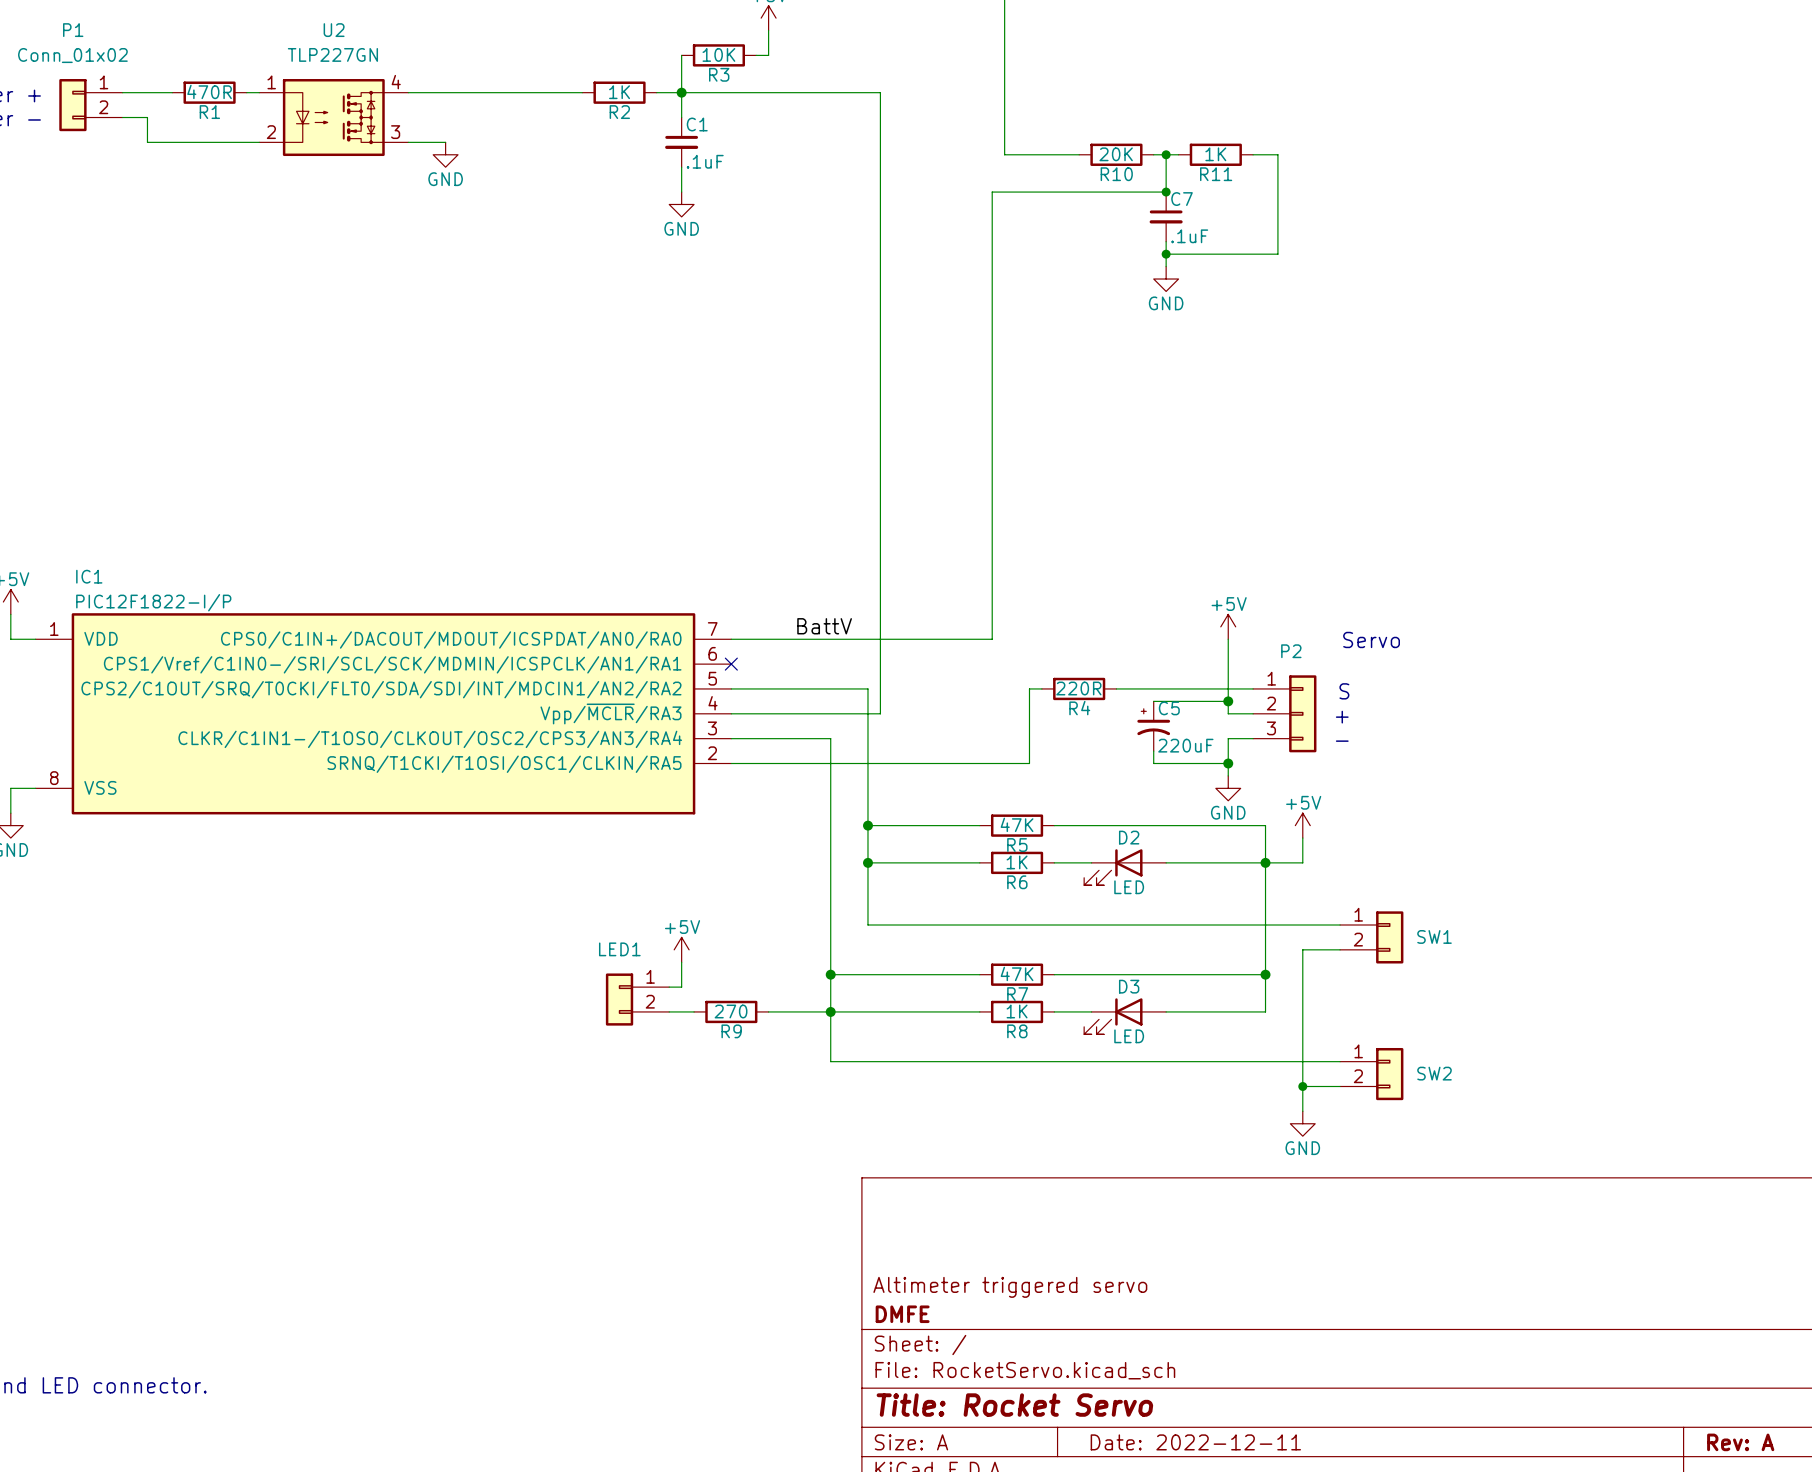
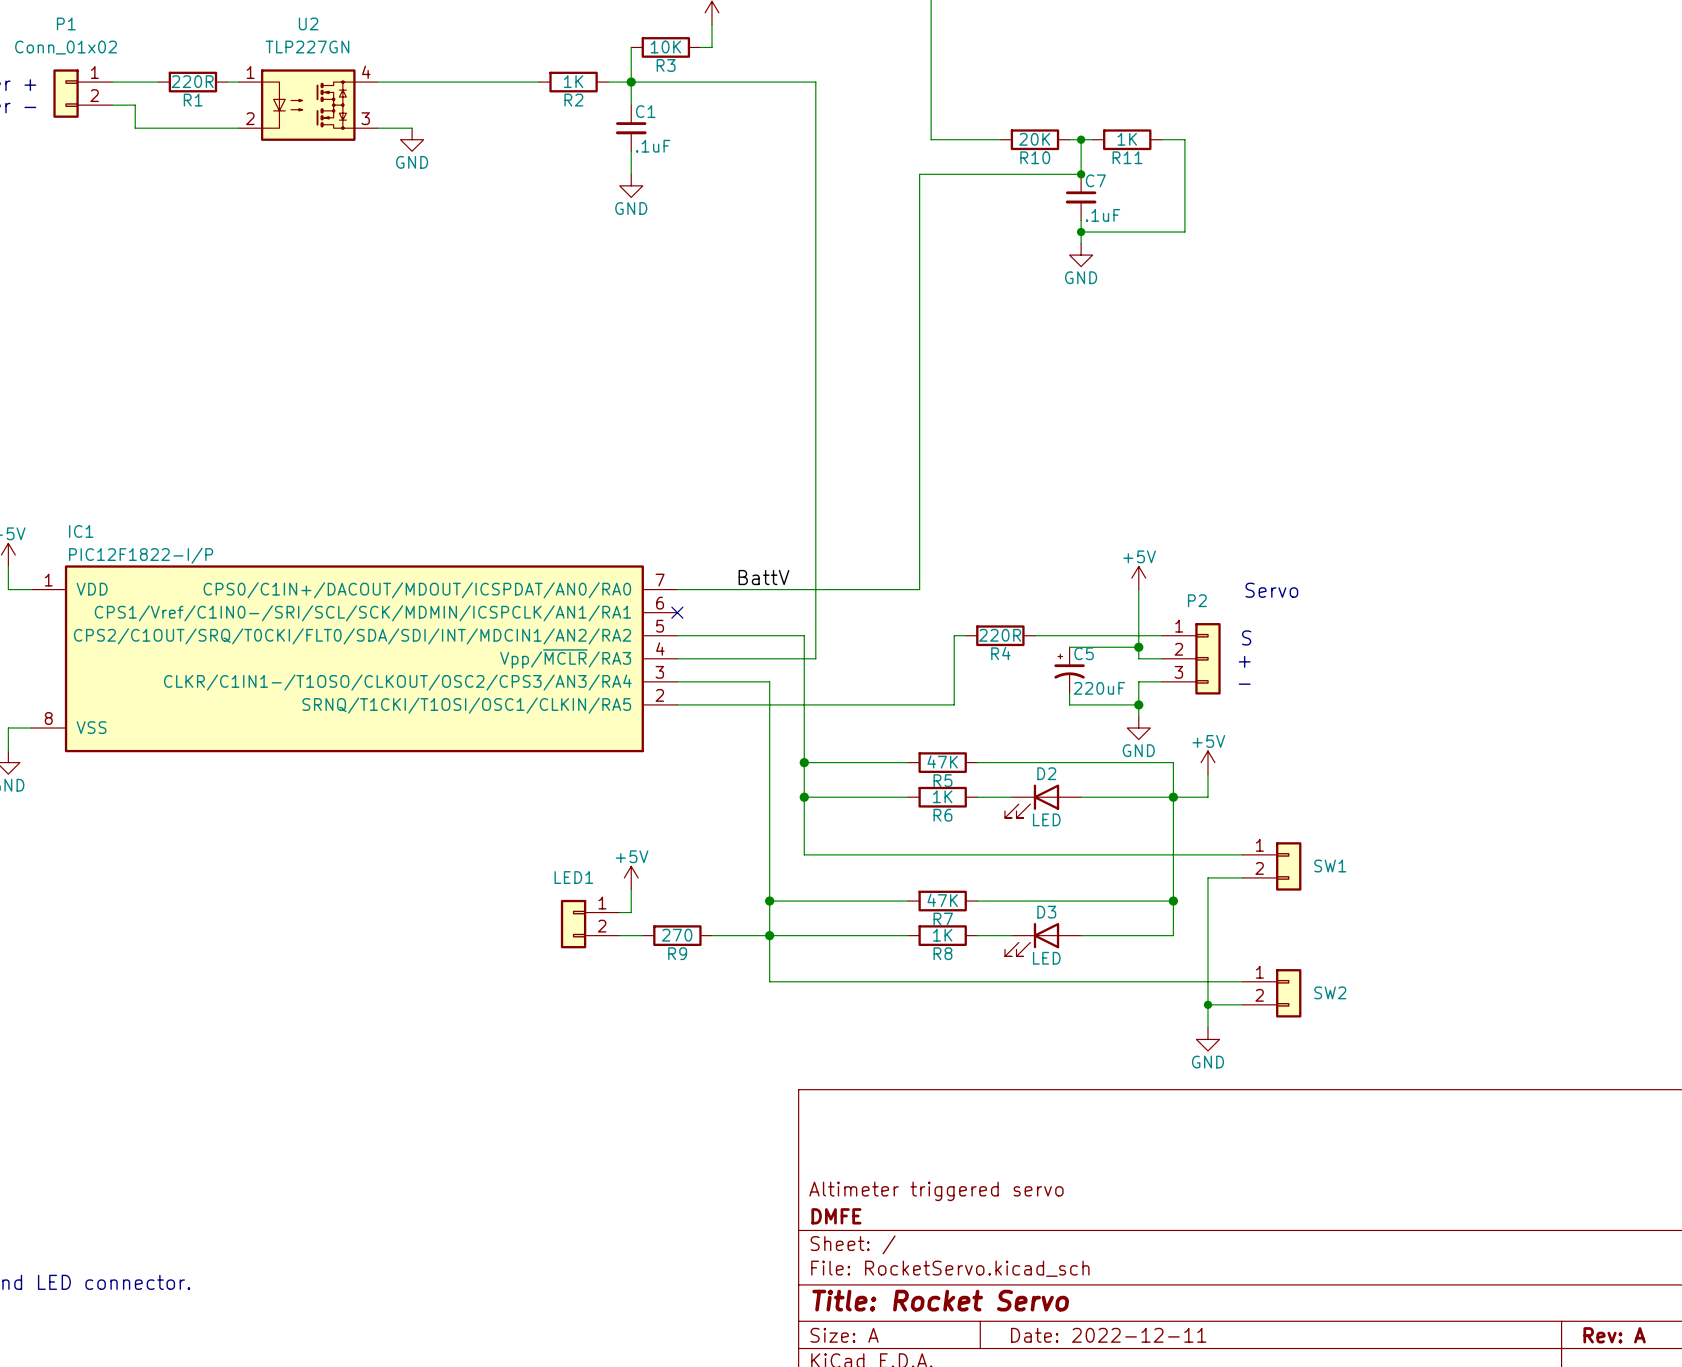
R1 value: 470R (209, 91) -> 220R (192, 81)

